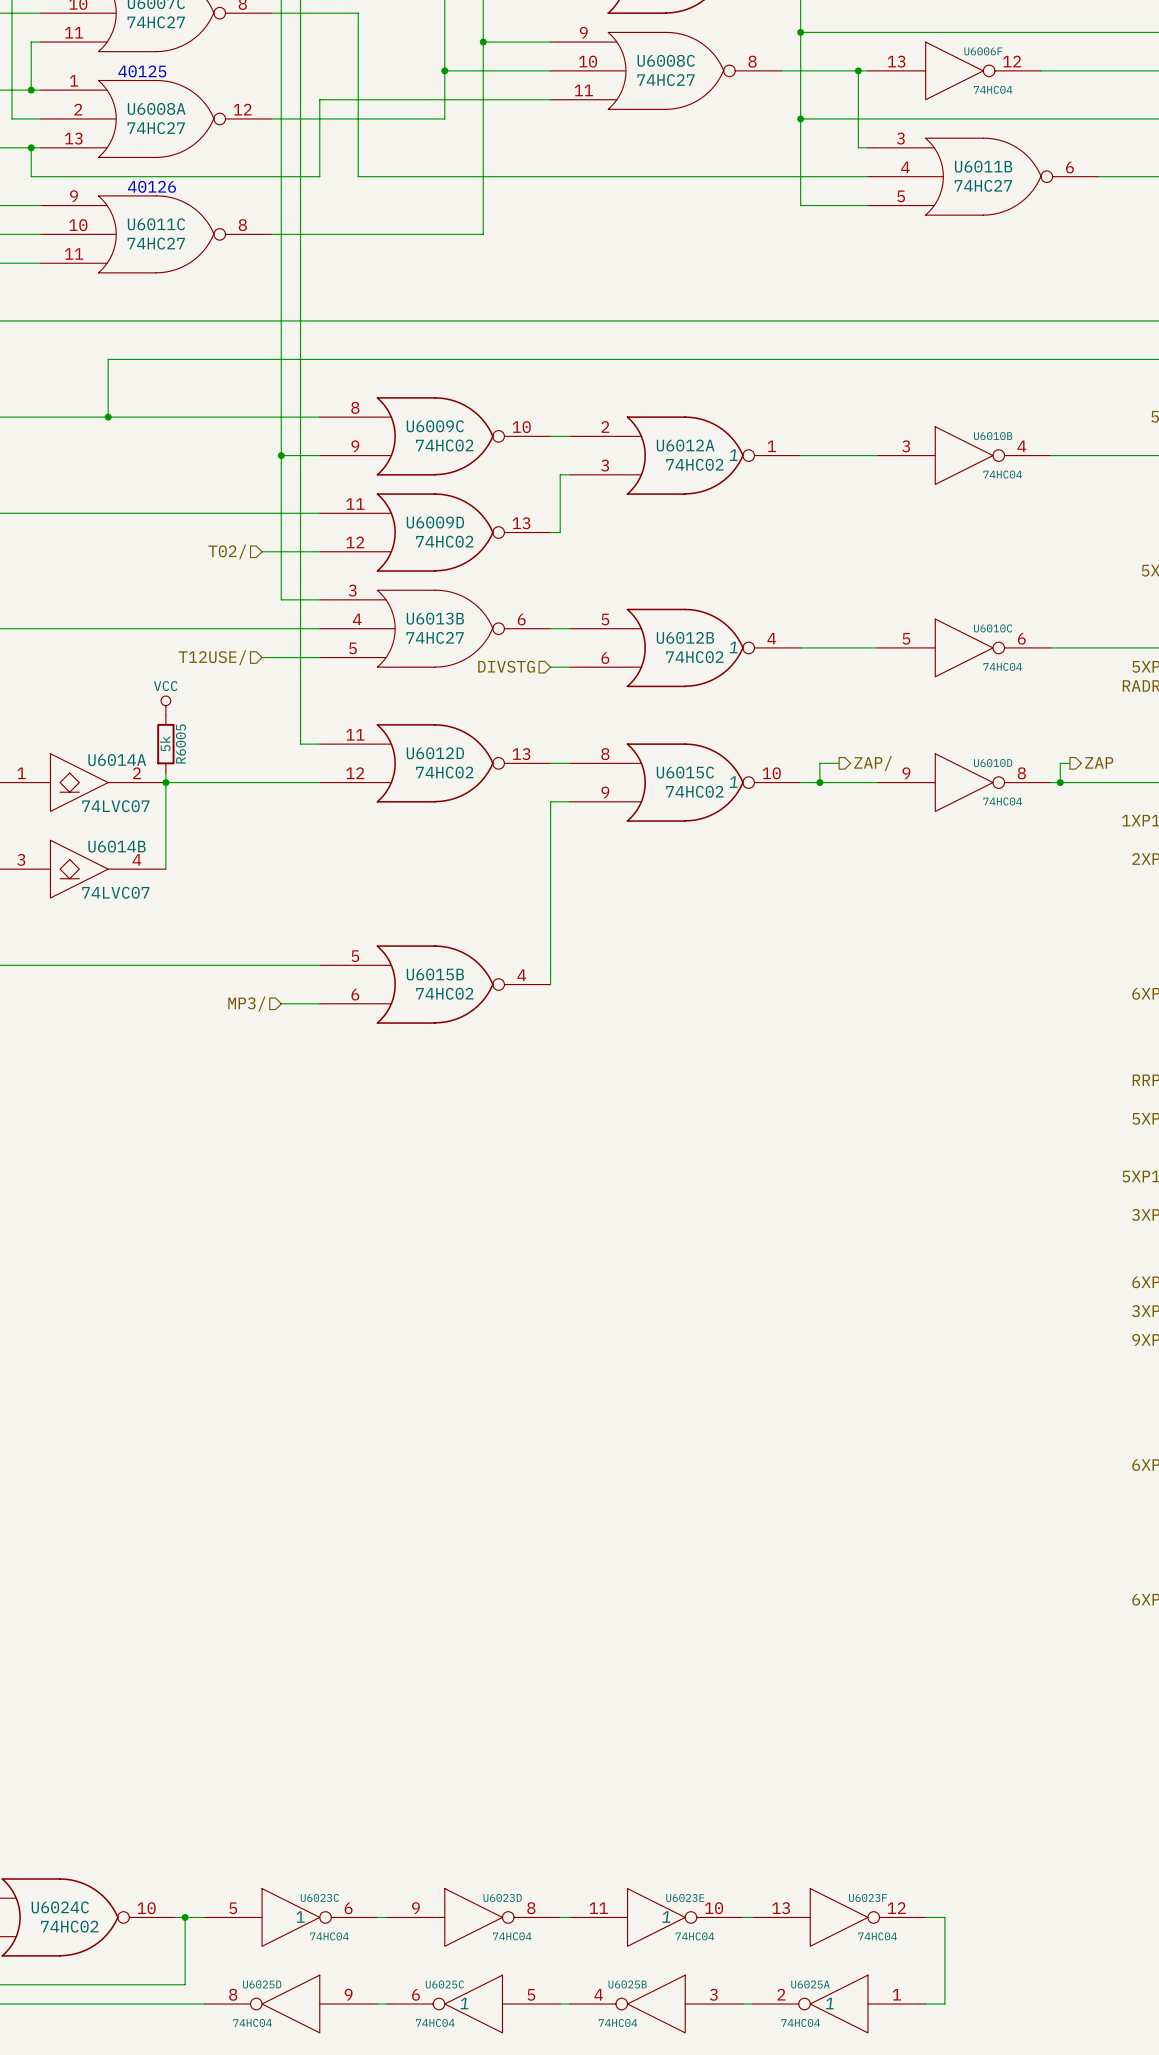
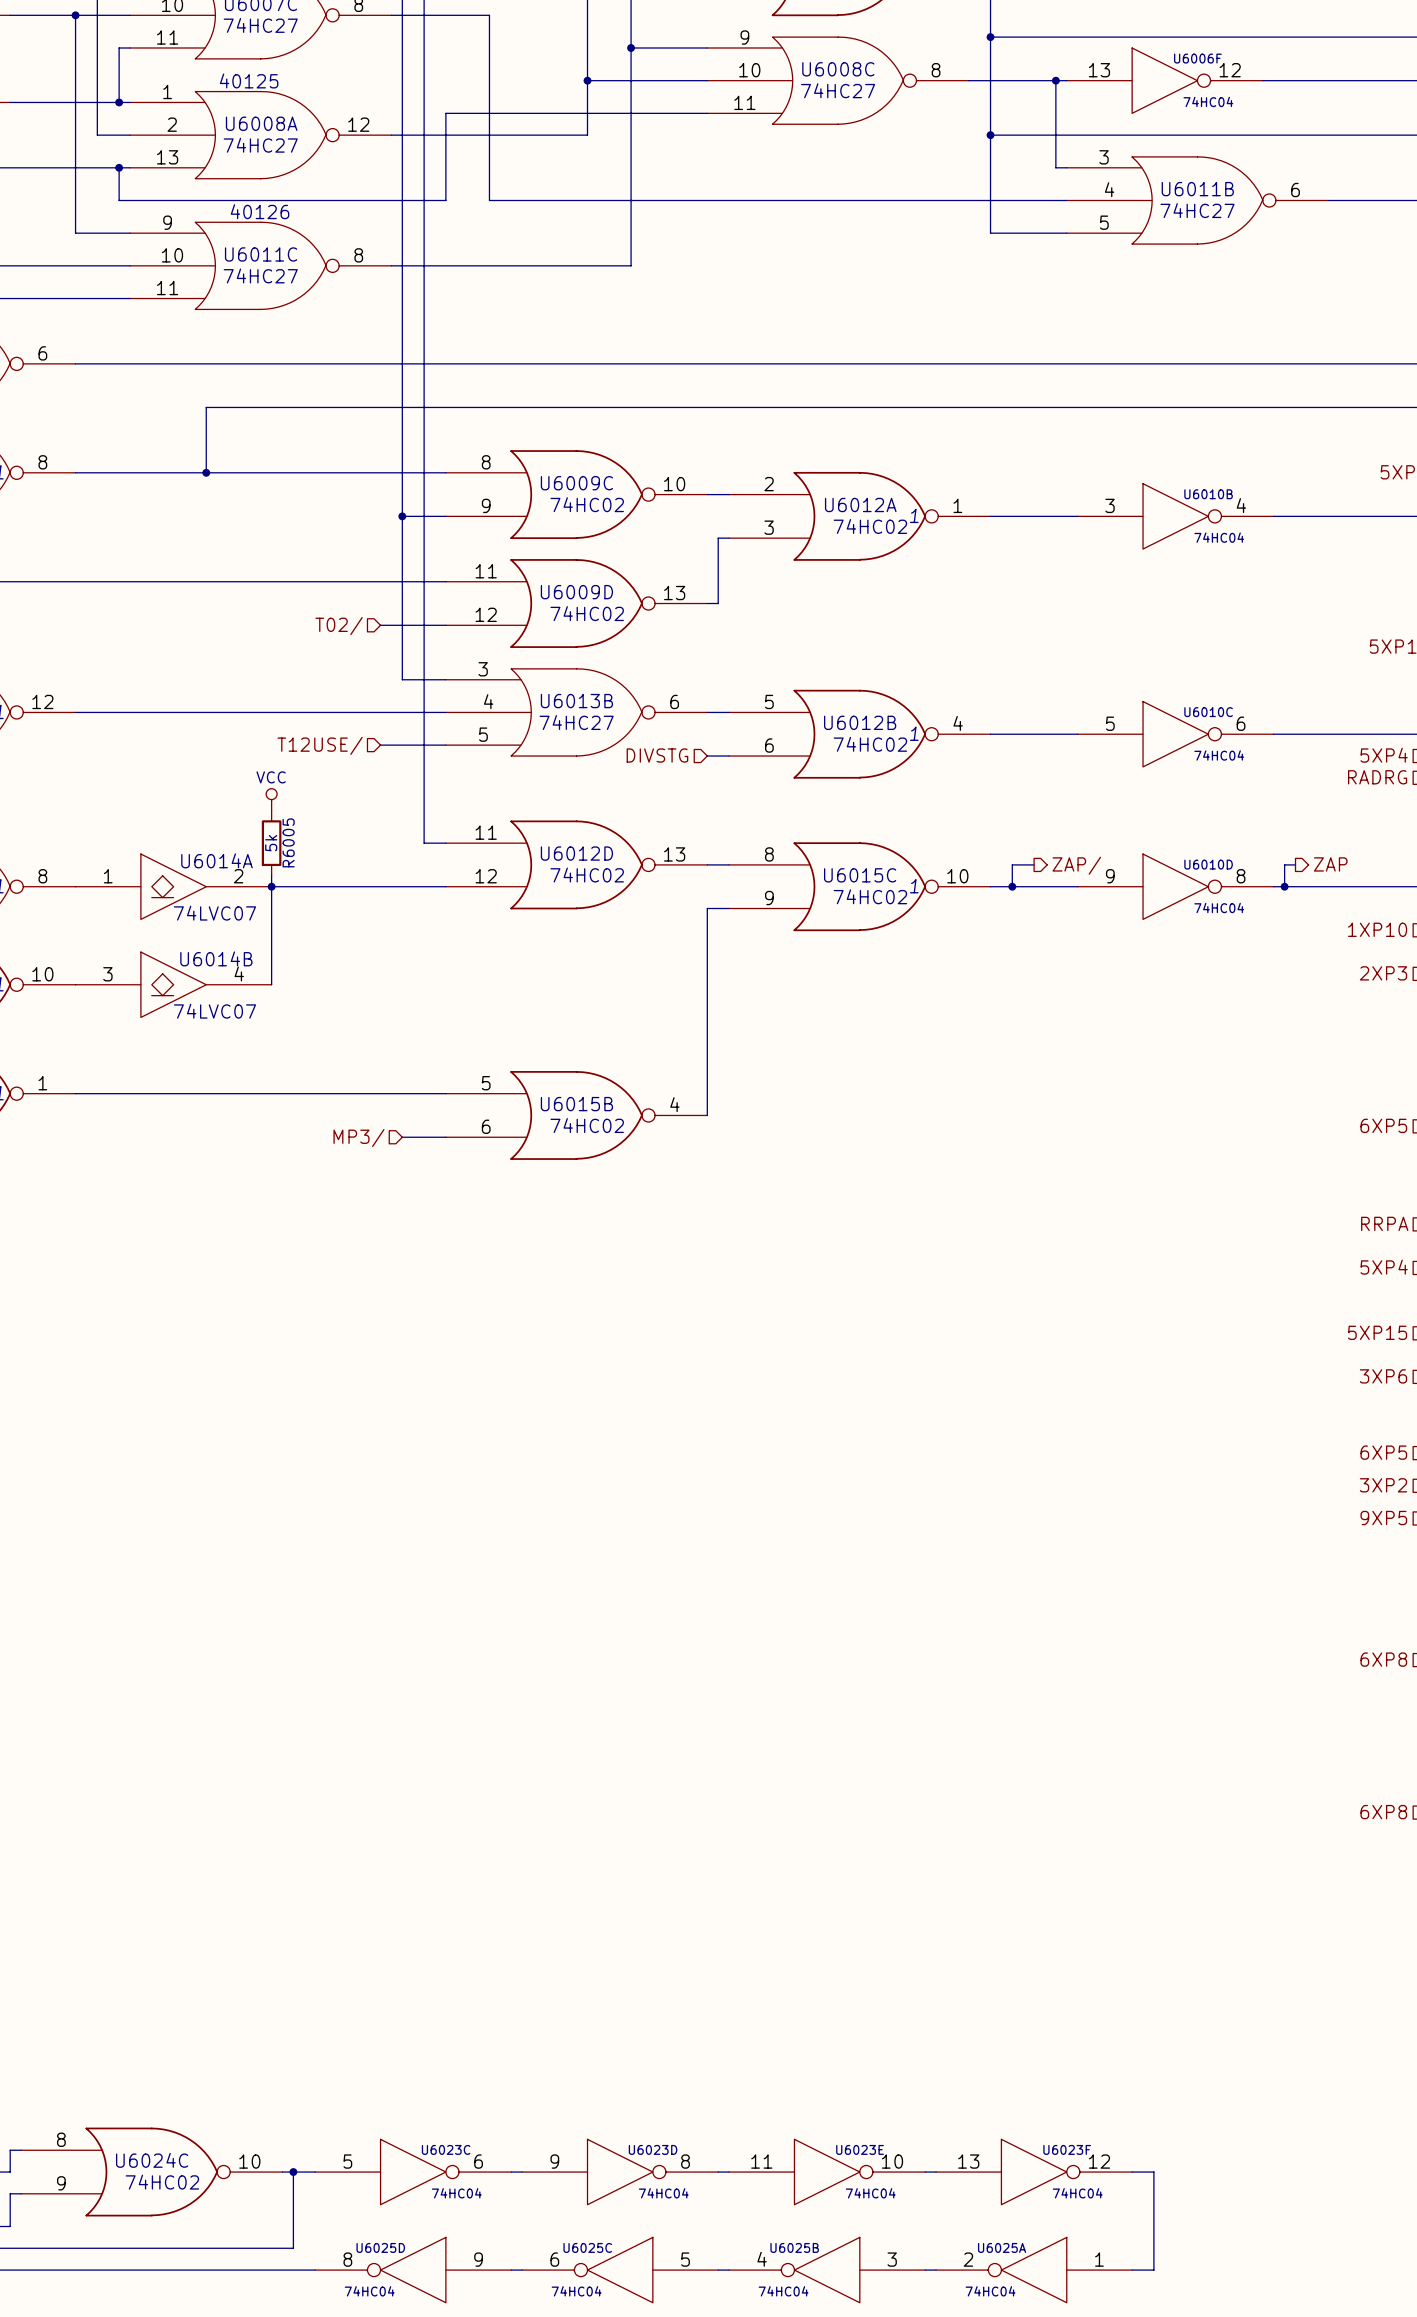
U6023C text: 1 (300, 1917) -> none
U6023E text: 1 (666, 1917) -> none
U6025C text: 1 (464, 2003) -> none
U6025A text: 1 (829, 2003) -> none

